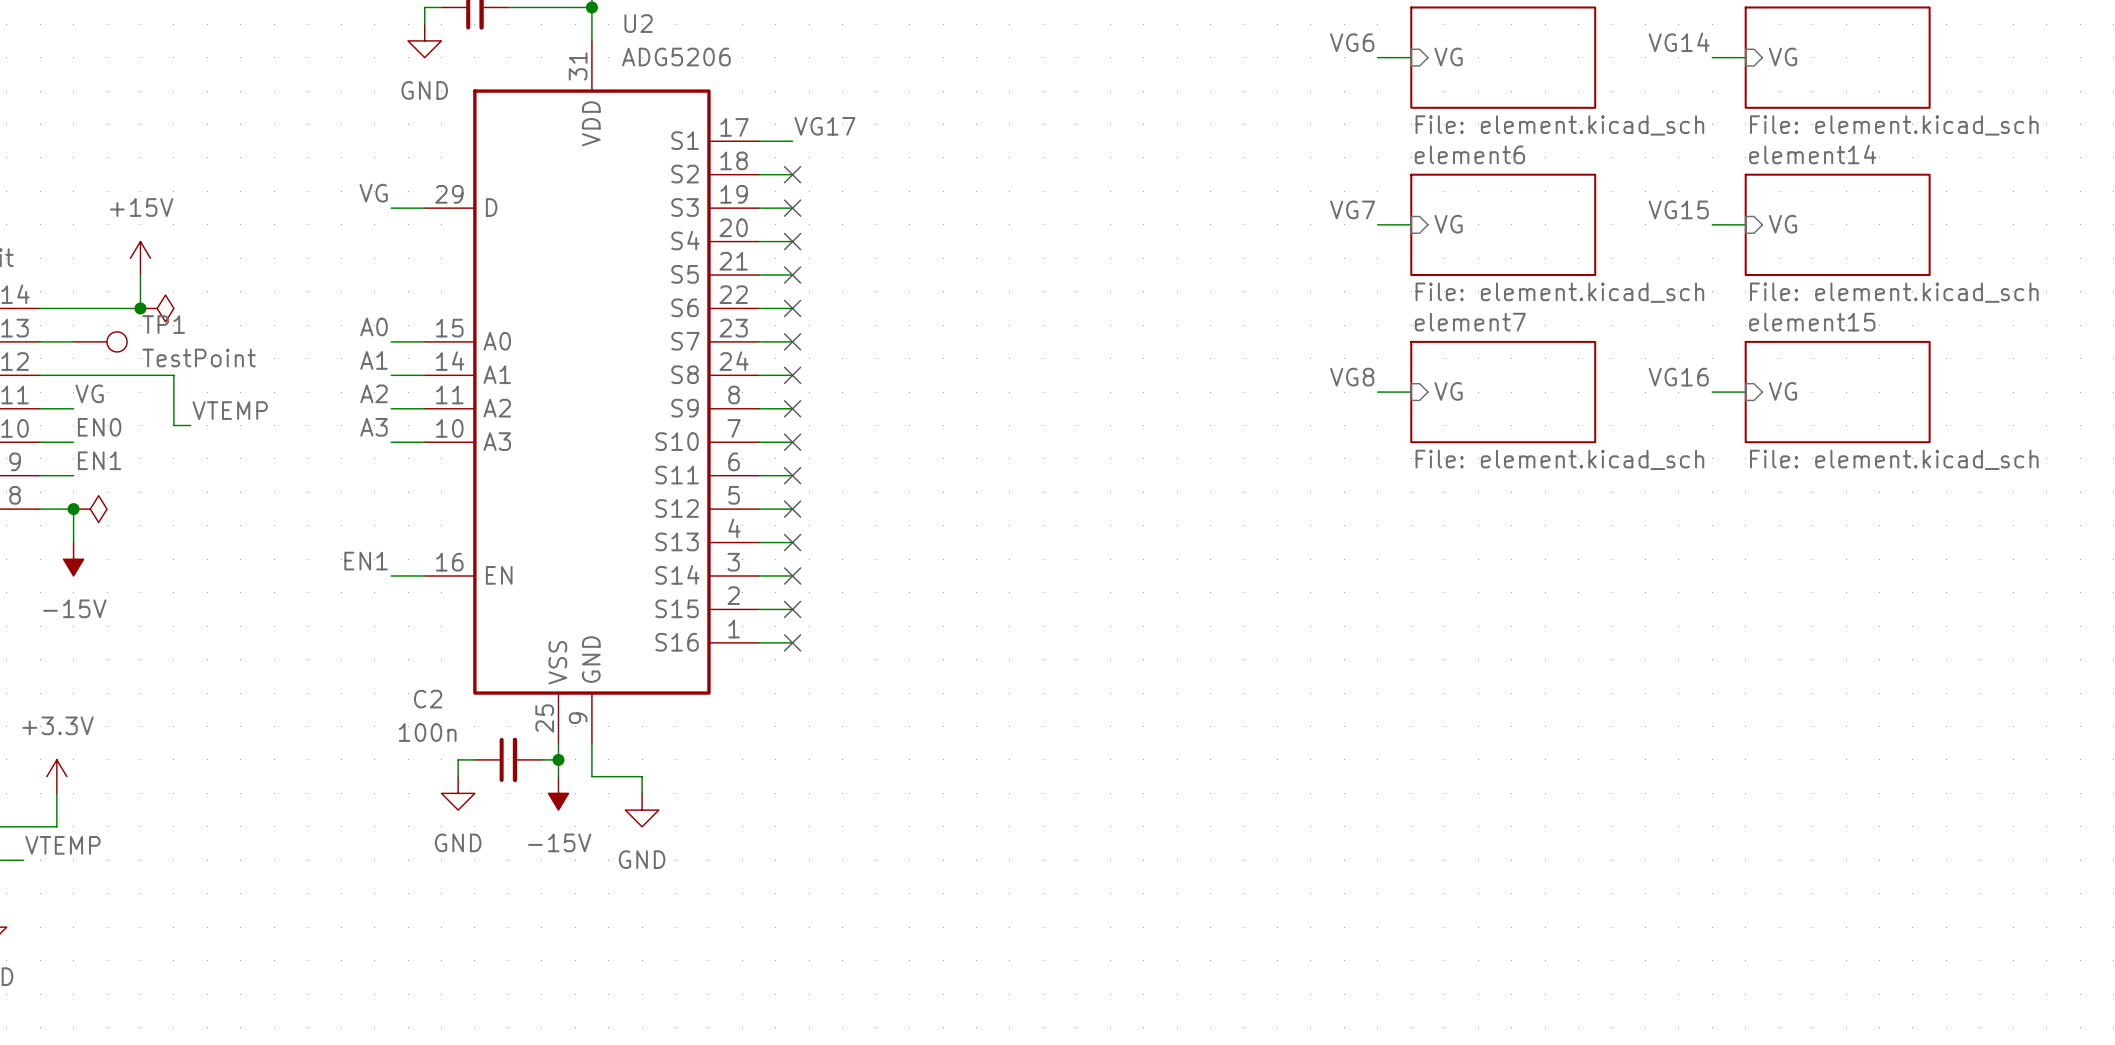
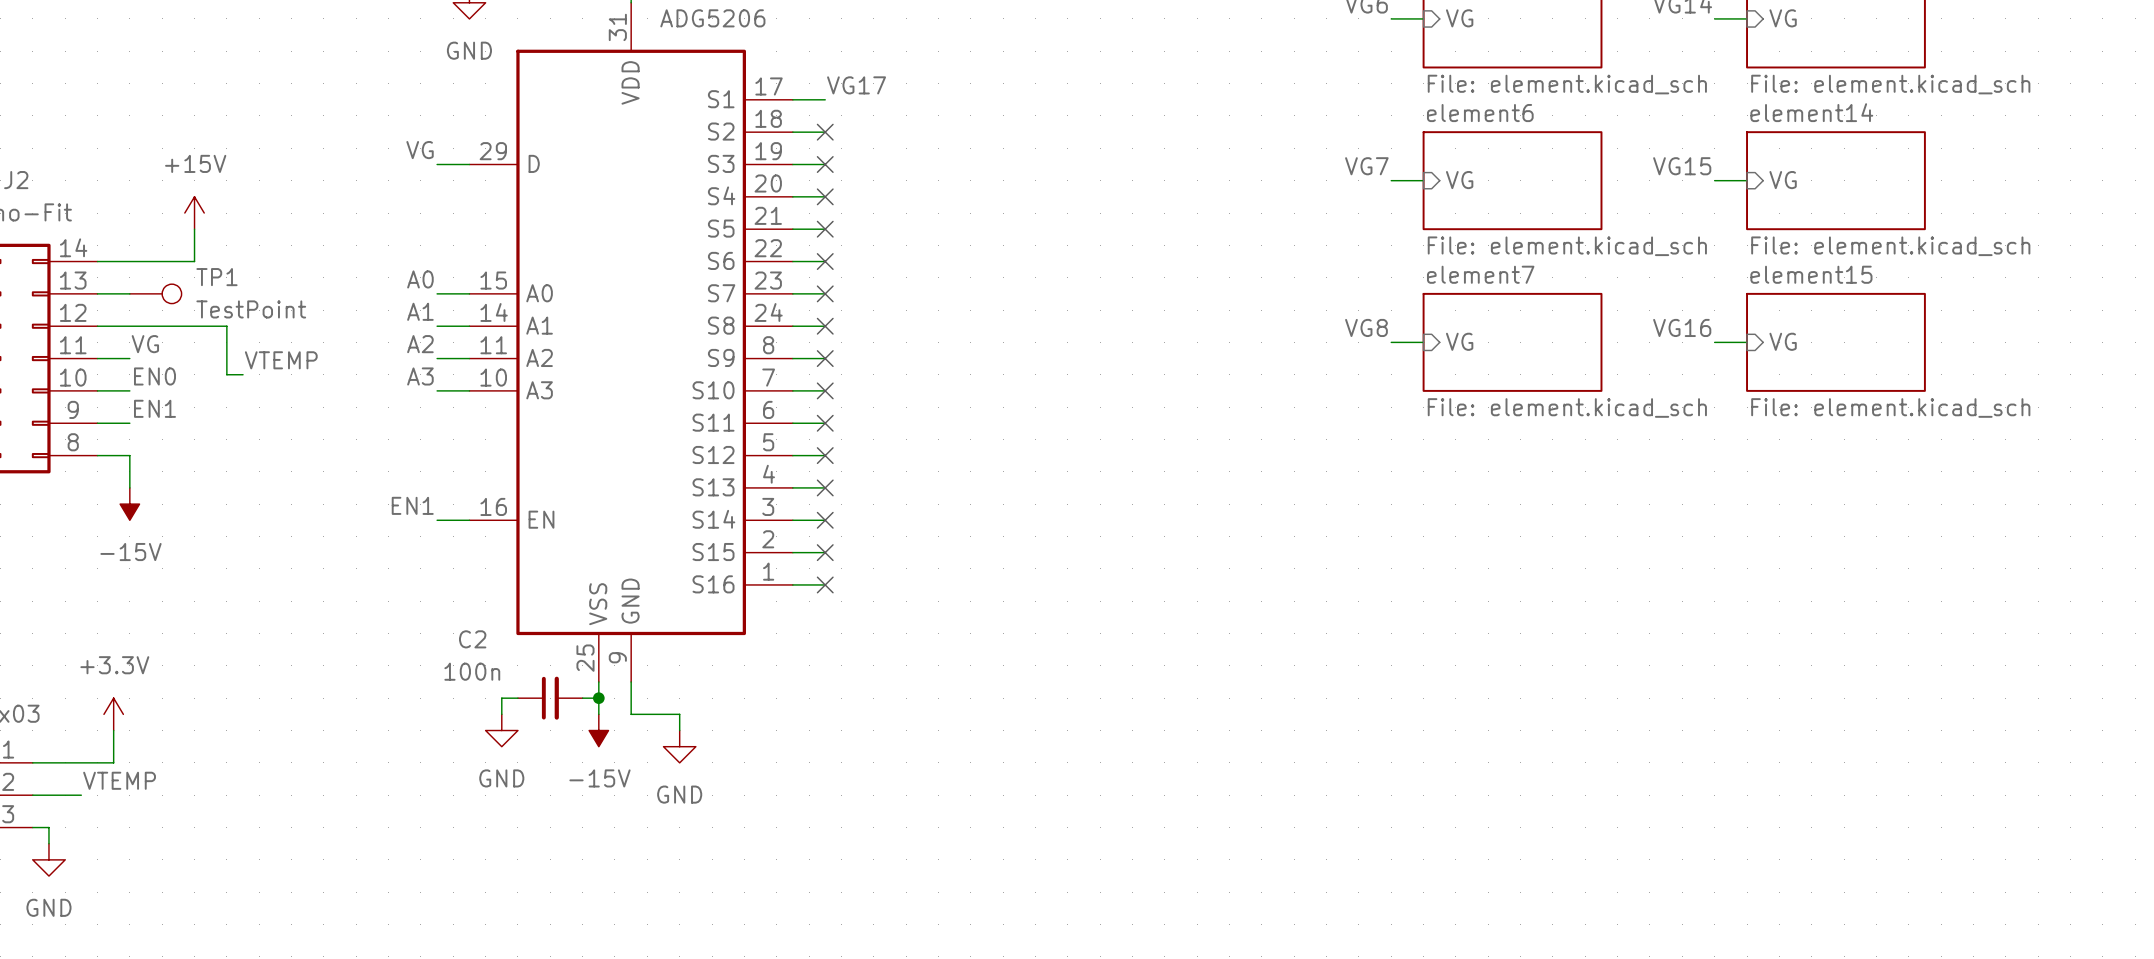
junction: (140, 308) -> none
power symbol: (157, 308) -> none
junction: (73, 509) -> none
power symbol: (90, 509) -> none

